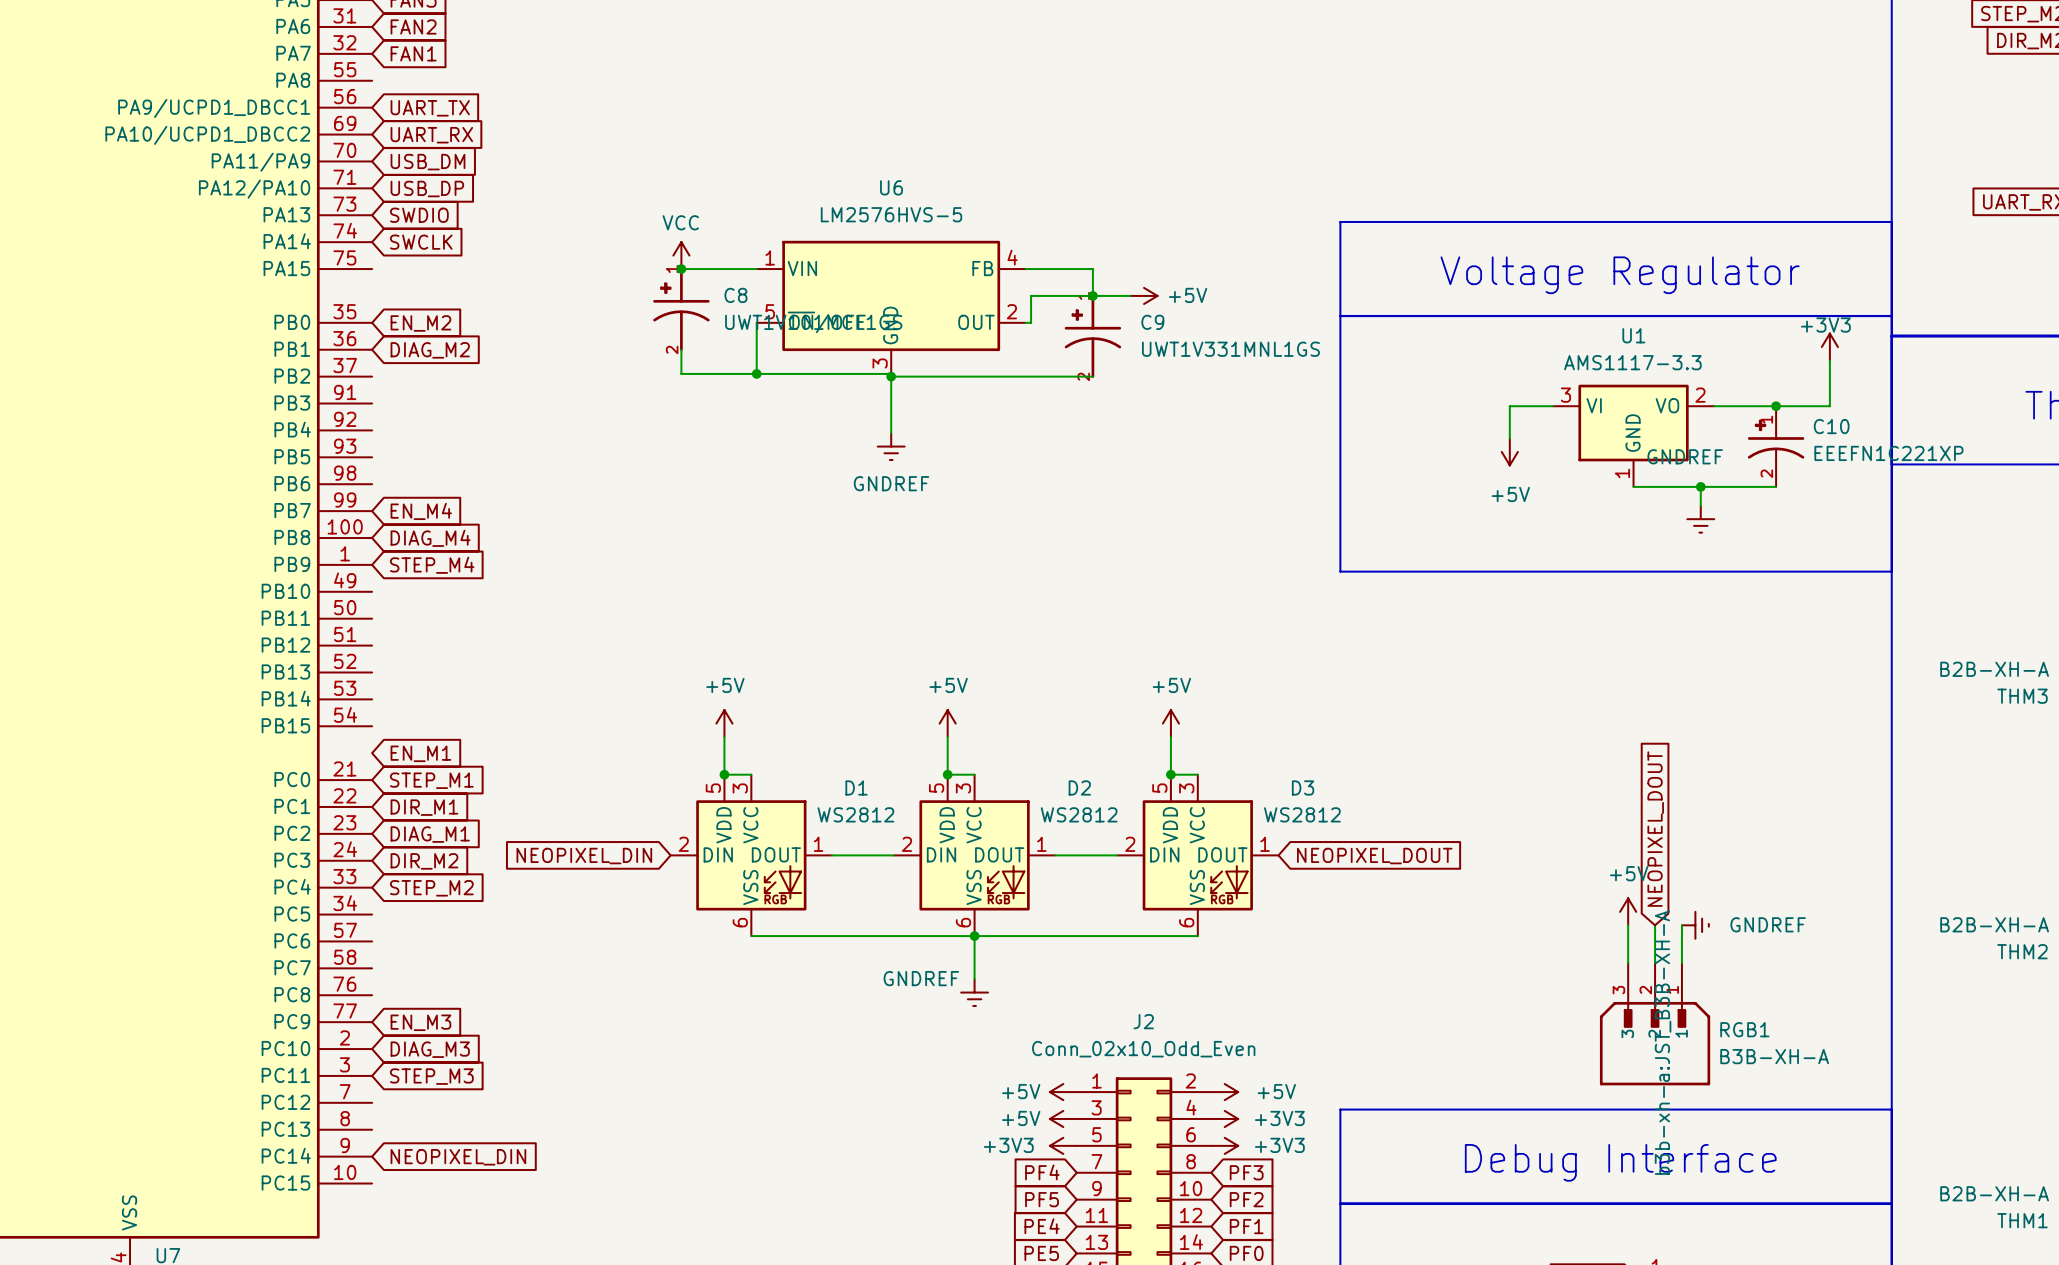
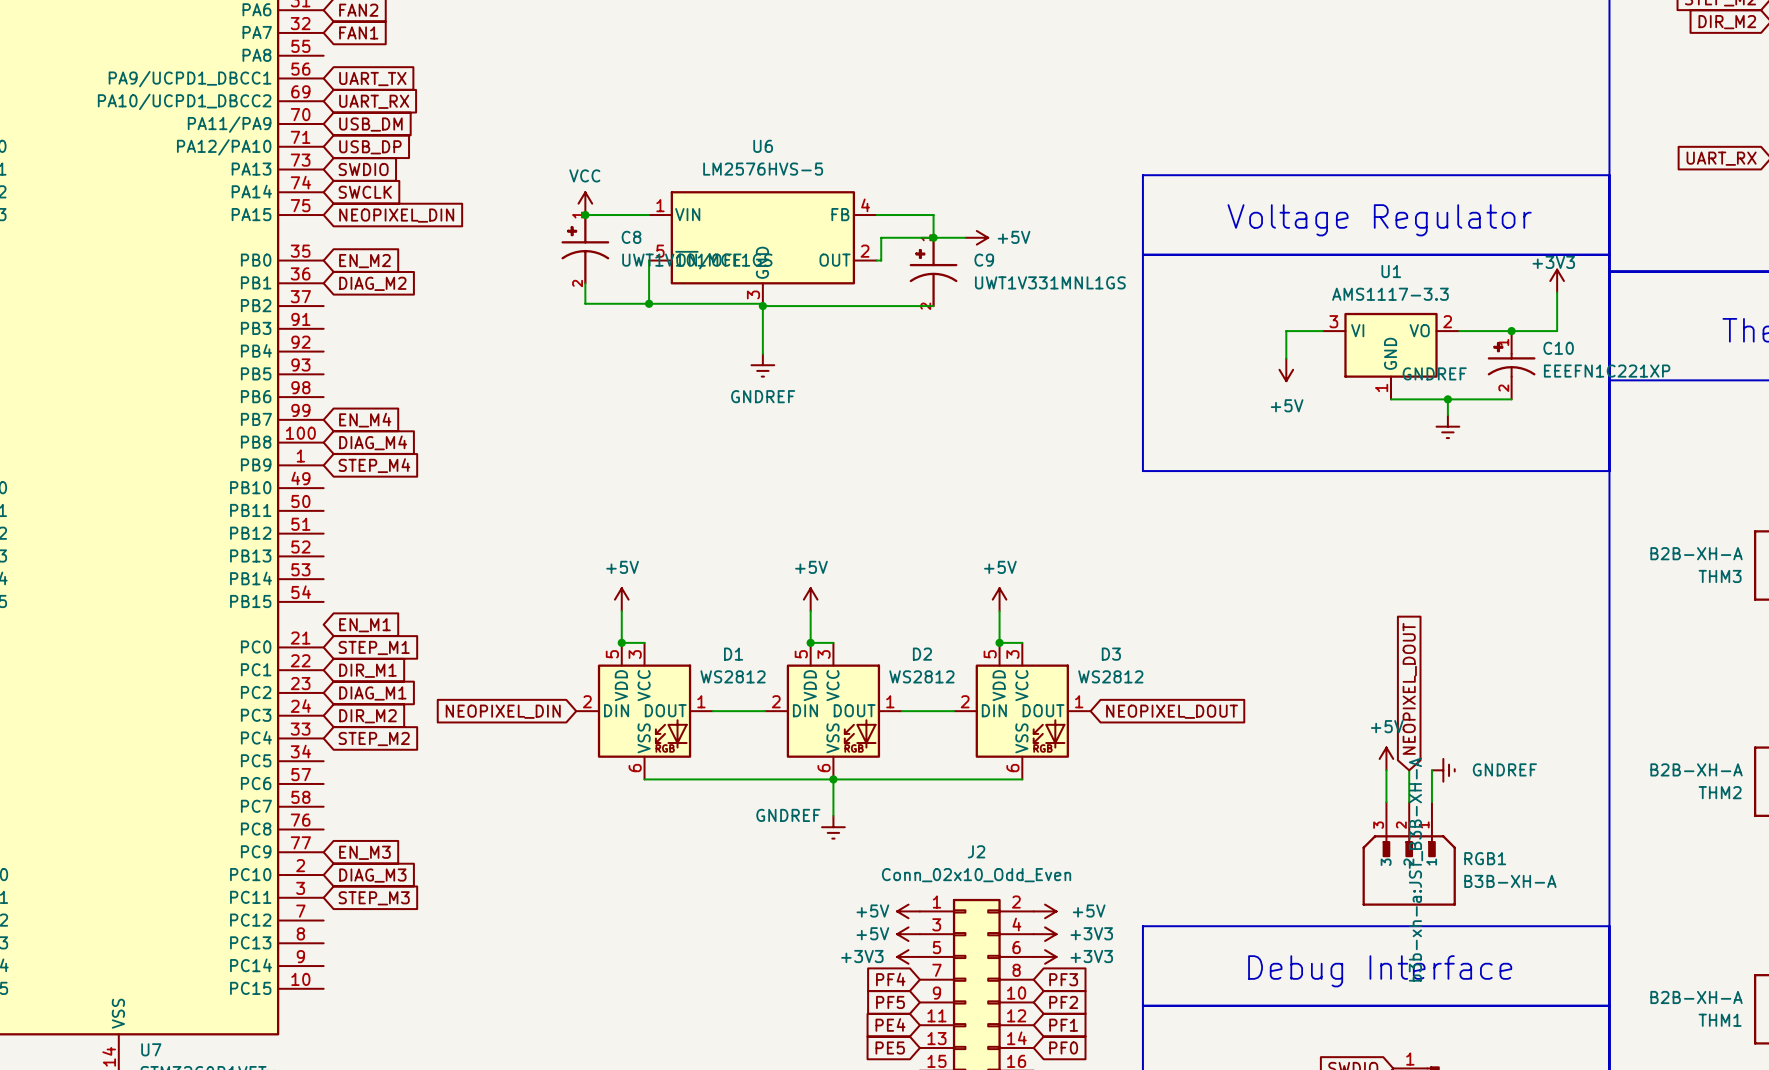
global label: none -> NEOPIXEL_DIN (396, 215)
global label: NEOPIXEL_DIN (458, 1157) -> none

